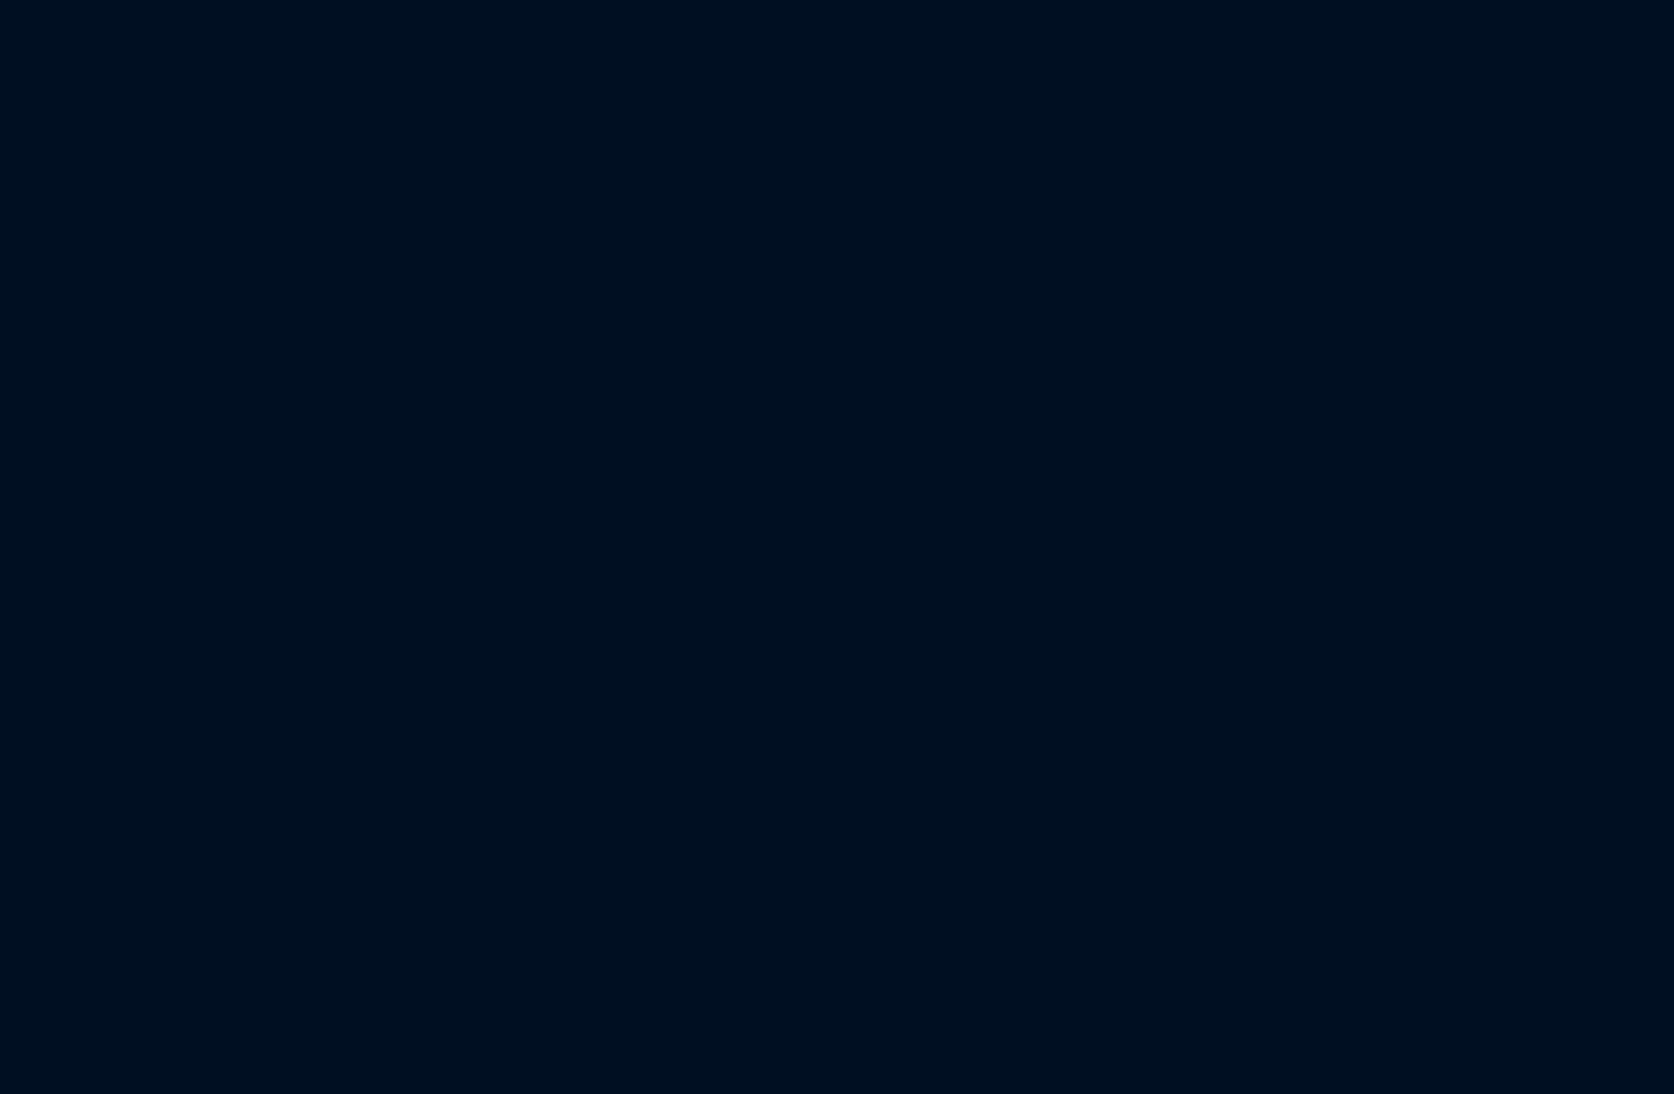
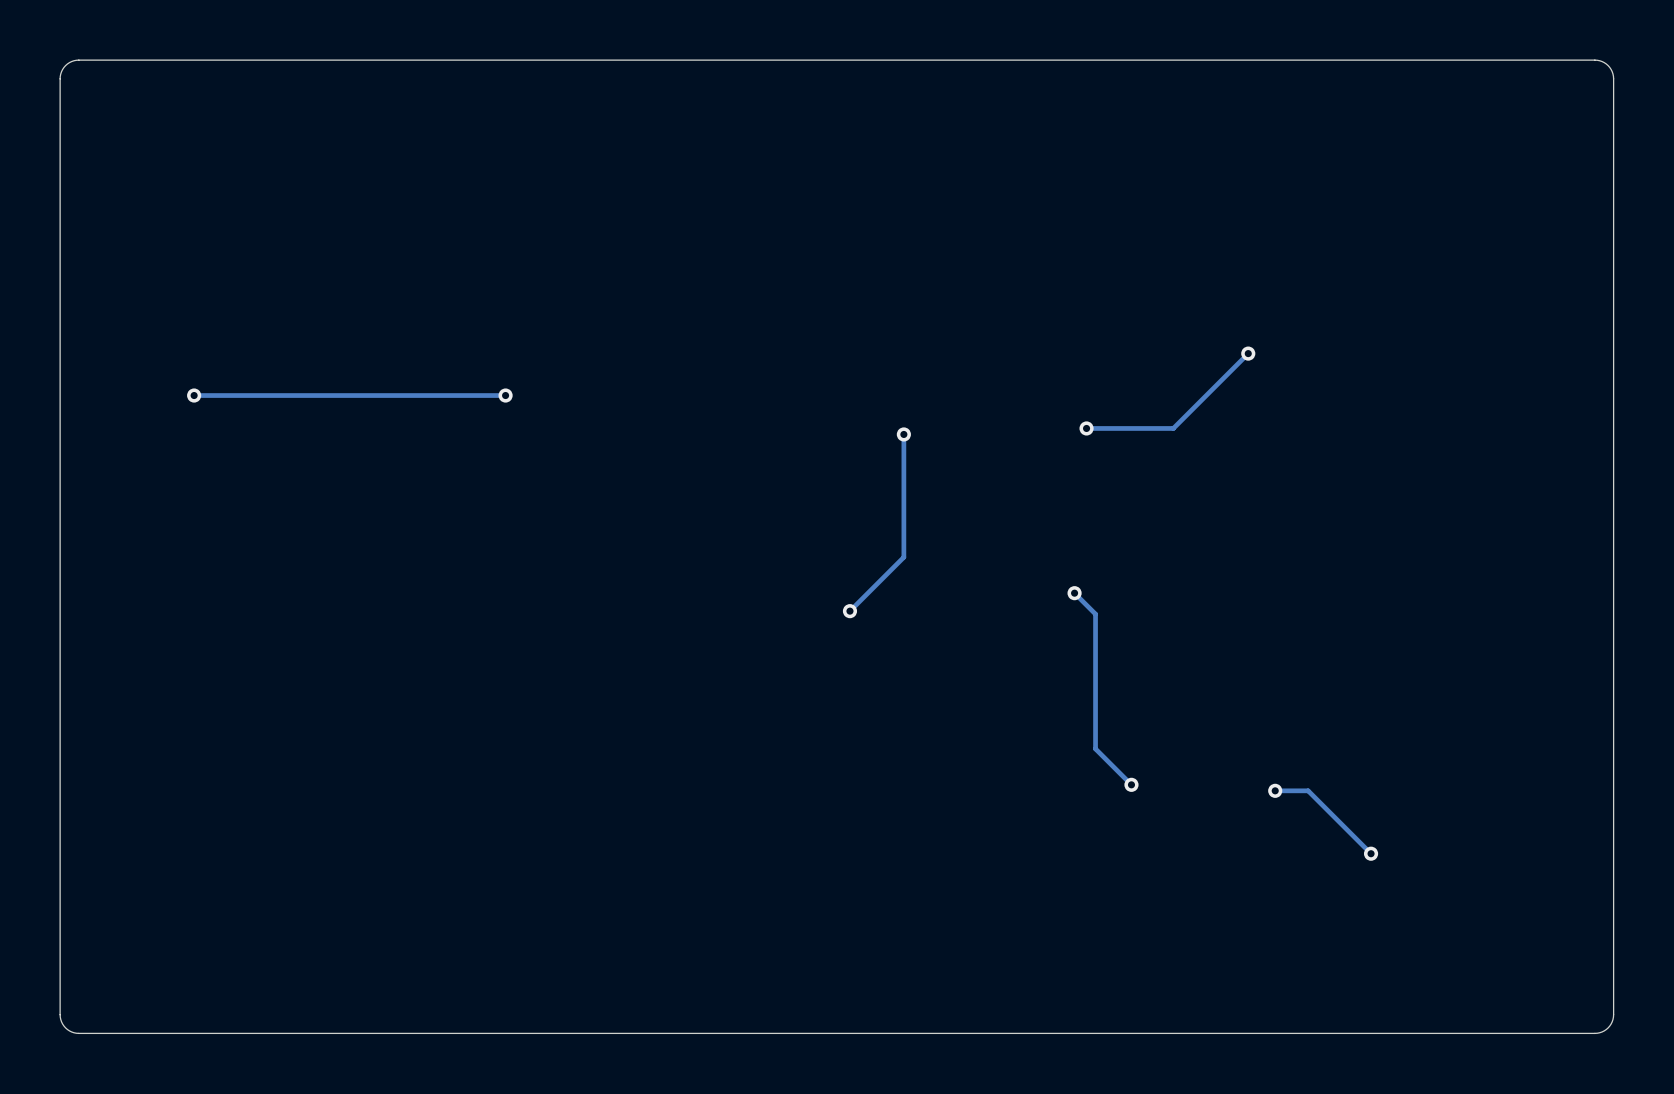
board edge: none -> (1594, 60) (78, 60) (69, 62) (62, 69) (60, 78) (60, 1014) (62, 1024) (69, 1030) (78, 1033) (1594, 1033) (1604, 1030) (1611, 1024) (1613, 1014) (1613, 78) (1608, 65) (1594, 60)
track: none -> (1248, 353) (1173, 428) (1086, 428)
via: none -> (1248, 353)
via: none -> (194, 395)
track: none -> (505, 395) (194, 395)
via: none -> (505, 395)
via: none -> (1086, 428)
track: none -> (903, 434) (903, 557) (849, 611)
via: none -> (903, 434)
track: none -> (1074, 593) (1095, 614) (1095, 748) (1131, 784)
via: none -> (1074, 593)
via: none -> (849, 611)
via: none -> (1131, 784)
track: none -> (1275, 790) (1308, 790) (1371, 853)
via: none -> (1275, 790)
via: none -> (1371, 853)

